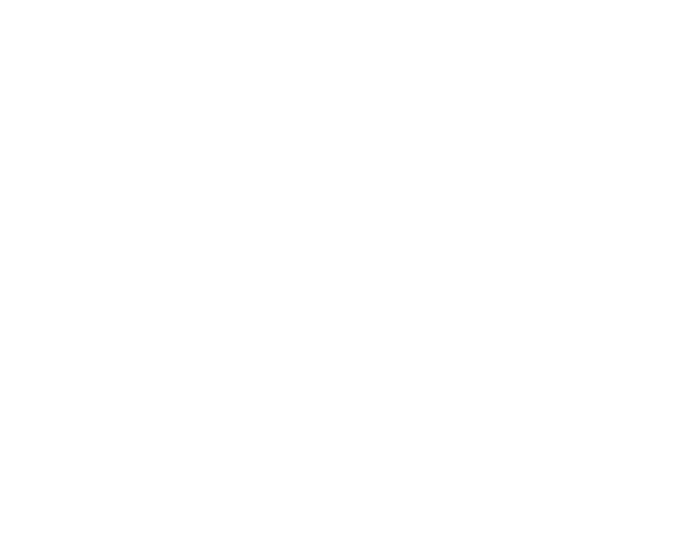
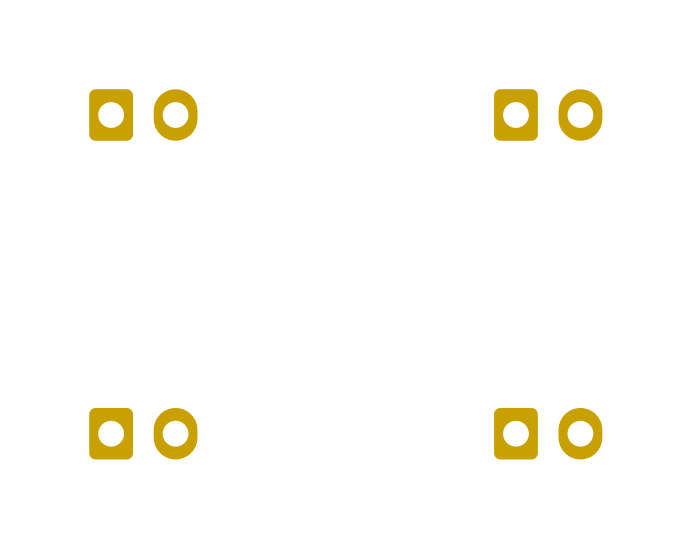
part: none -> (143, 115)
part: none -> (548, 115)
part: none -> (143, 433)
part: none -> (548, 433)

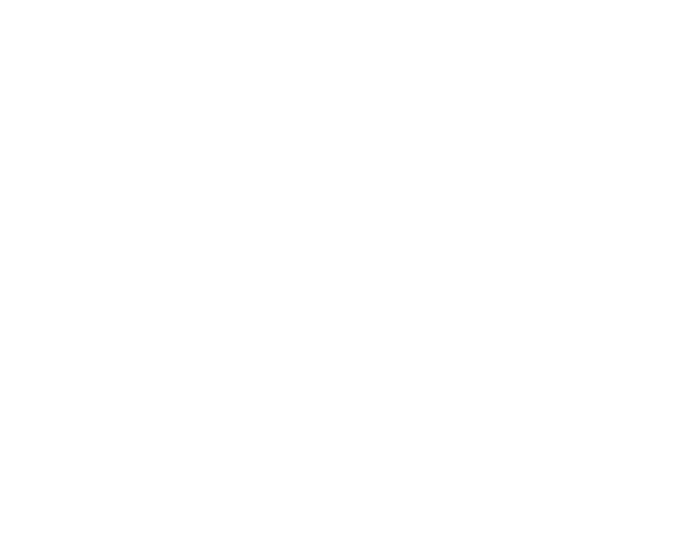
part: (143, 115) -> none
part: (548, 115) -> none
part: (143, 433) -> none
part: (548, 433) -> none

